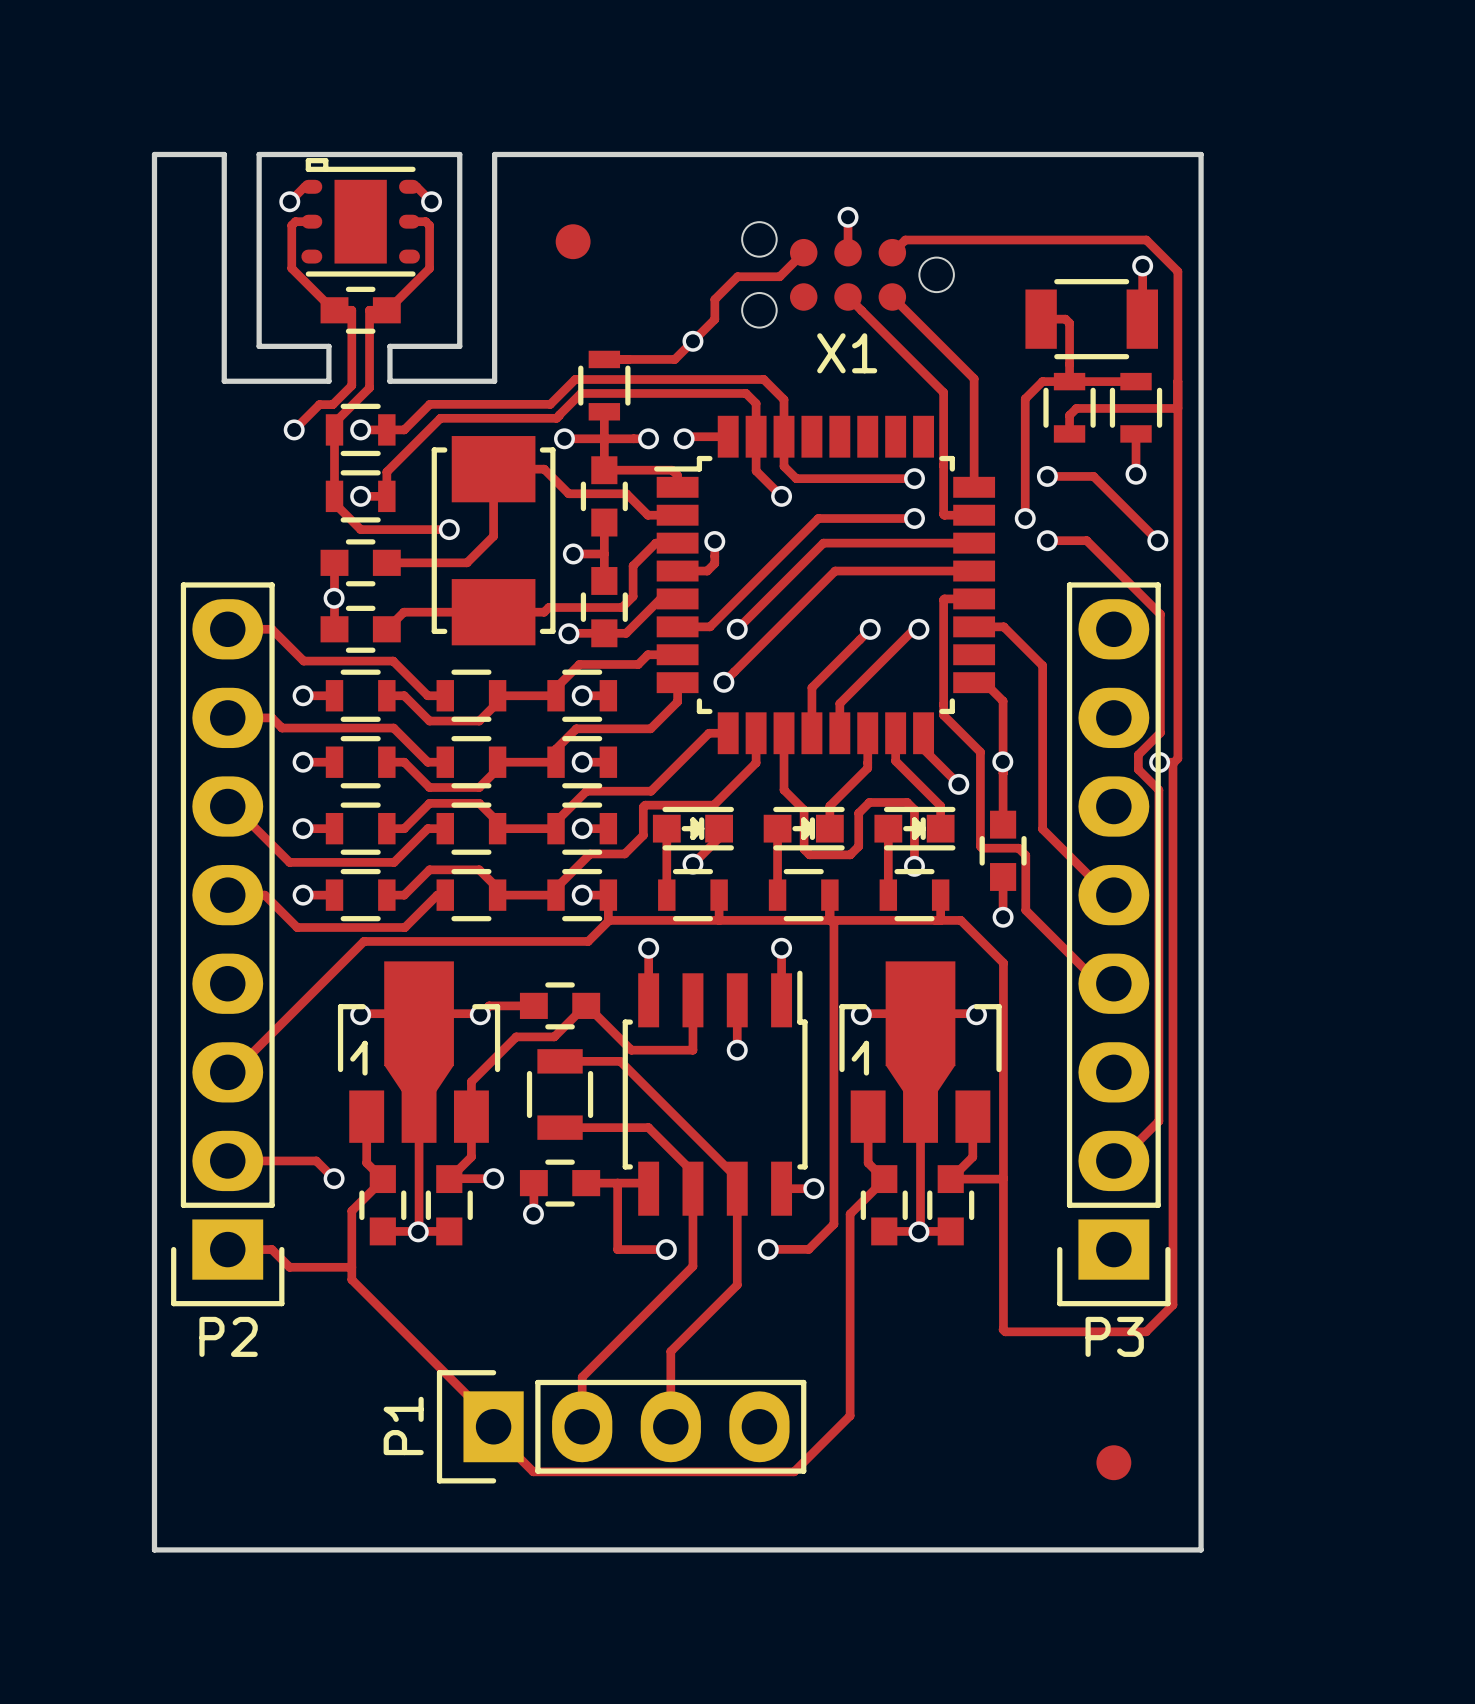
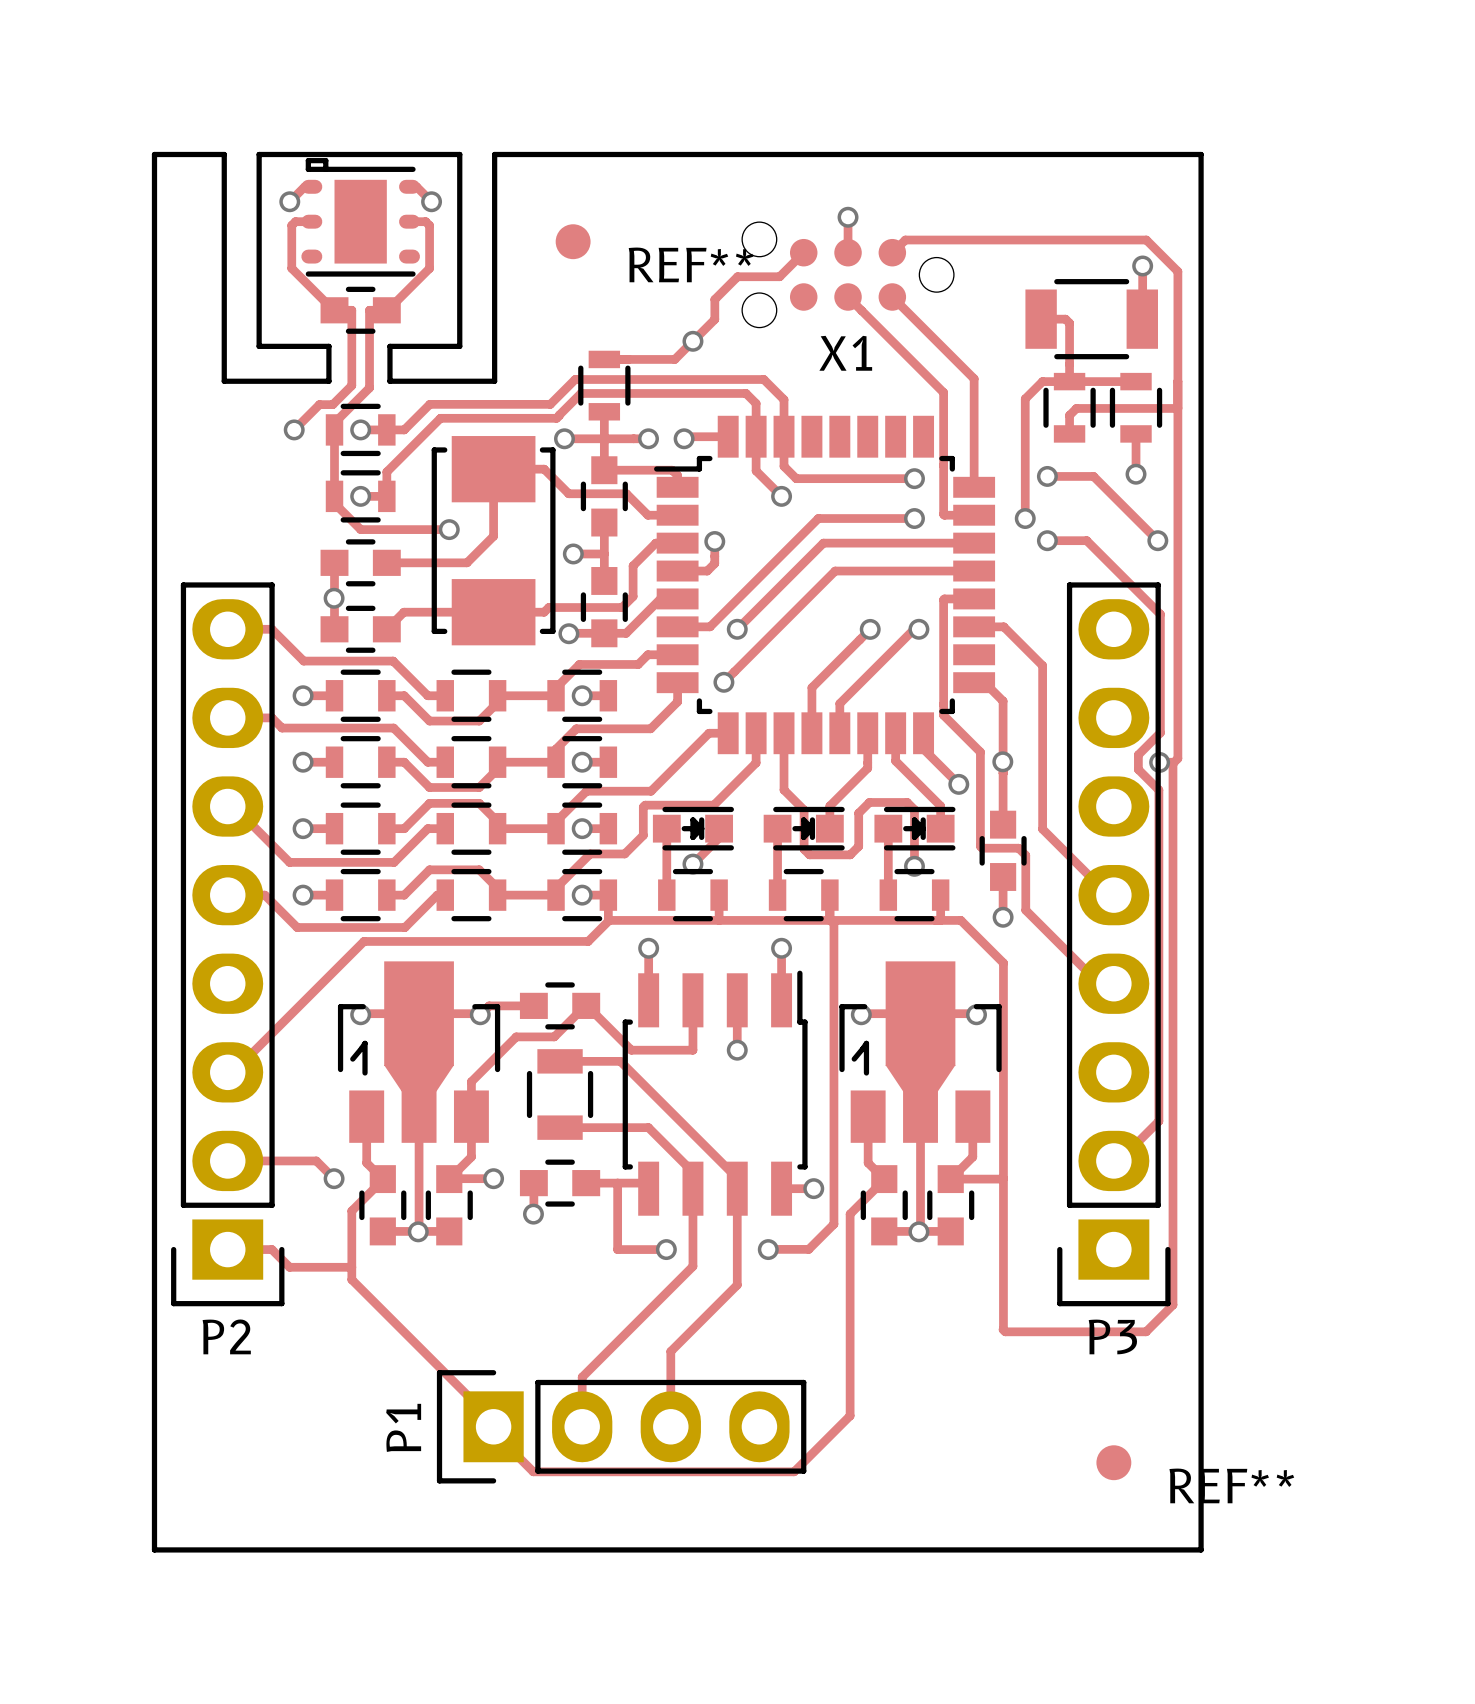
REF** name: none -> REF** (691, 264)
REF** name: none -> REF** (1231, 1485)

